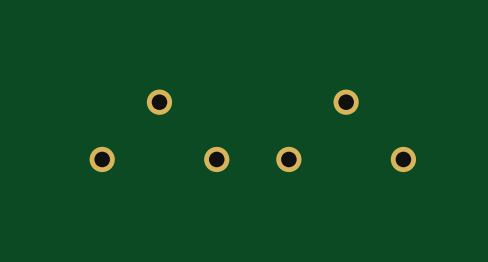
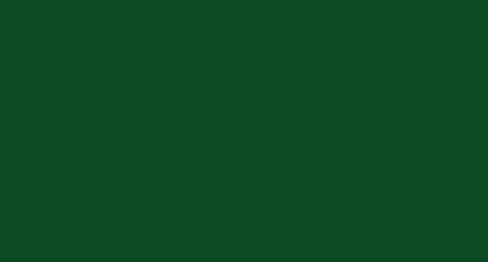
part: (159, 130) -> none
part: (346, 130) -> none

